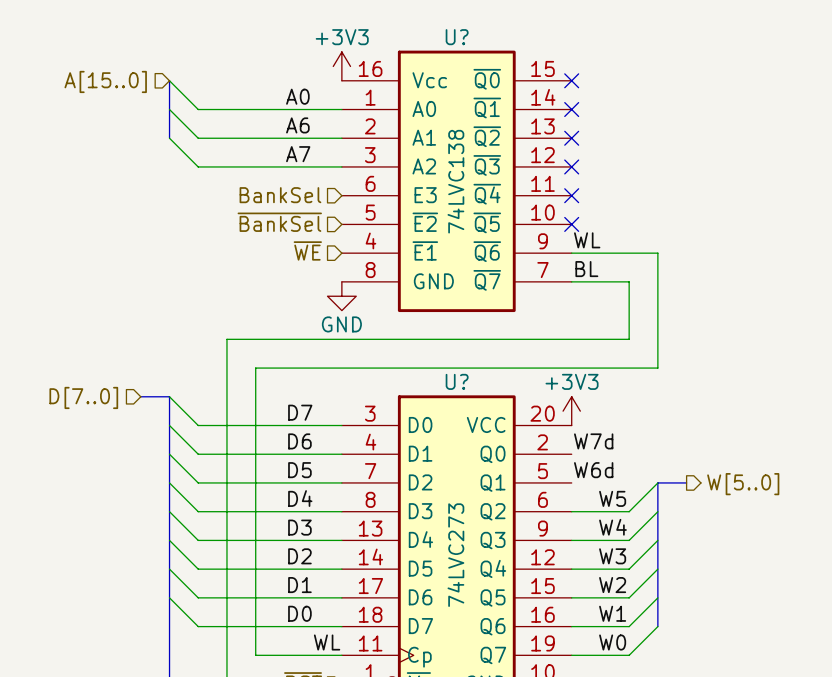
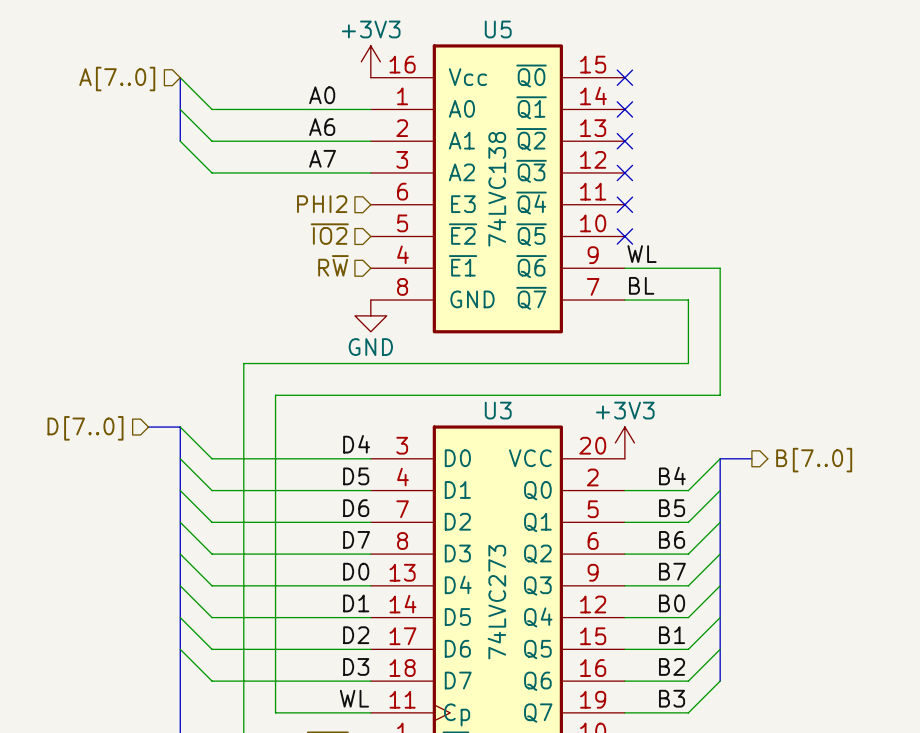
U? name: U? (457, 37) -> U5 (498, 29)
hierarchical label: A[15..0] (105, 81) -> A[7..0] (117, 79)
hierarchical label: BankSel (280, 195) -> PHI2 (322, 204)
hierarchical label: ~{BankSel} (279, 222) -> ~{IO2} (329, 234)
hierarchical label: ~{WE} (307, 250) -> R~{W} (333, 265)
U? name: U? (457, 381) -> U3 (498, 410)
label position: D7 (300, 412) -> D7 (356, 539)
wire: none -> (720, 458) (688, 490) (624, 490)
hierarchical label: none -> B[7..0] (814, 460)
label position: D6 (299, 441) -> D6 (356, 508)
label: W7d (593, 441) -> none
label: none -> B4 (672, 476)
wire: none -> (720, 490) (688, 522) (624, 522)
label position: D5 (299, 470) -> D5 (356, 476)
label: W6d (593, 470) -> none
label: none -> B5 (672, 508)
bus: (657, 482) (686, 482) -> (720, 522) (720, 458) (751, 458)
hierarchical label: W[5..0] (743, 484) -> none
label position: D4 (300, 498) -> D4 (356, 444)
label: W5 (612, 498) -> B6 (672, 539)
label position: D3 (299, 527) -> D3 (356, 666)
label: W4 (612, 527) -> B7 (672, 571)
label position: D2 (299, 556) -> D2 (356, 635)
label: W3 (612, 556) -> B0 (672, 603)
label position: D1 (299, 585) -> D1 (356, 603)
label: W2 (612, 585) -> B1 (672, 635)
label position: D0 (299, 613) -> D0 (356, 571)
label: W1 (612, 613) -> B2 (672, 666)
label: W0 (612, 642) -> B3 (672, 698)

